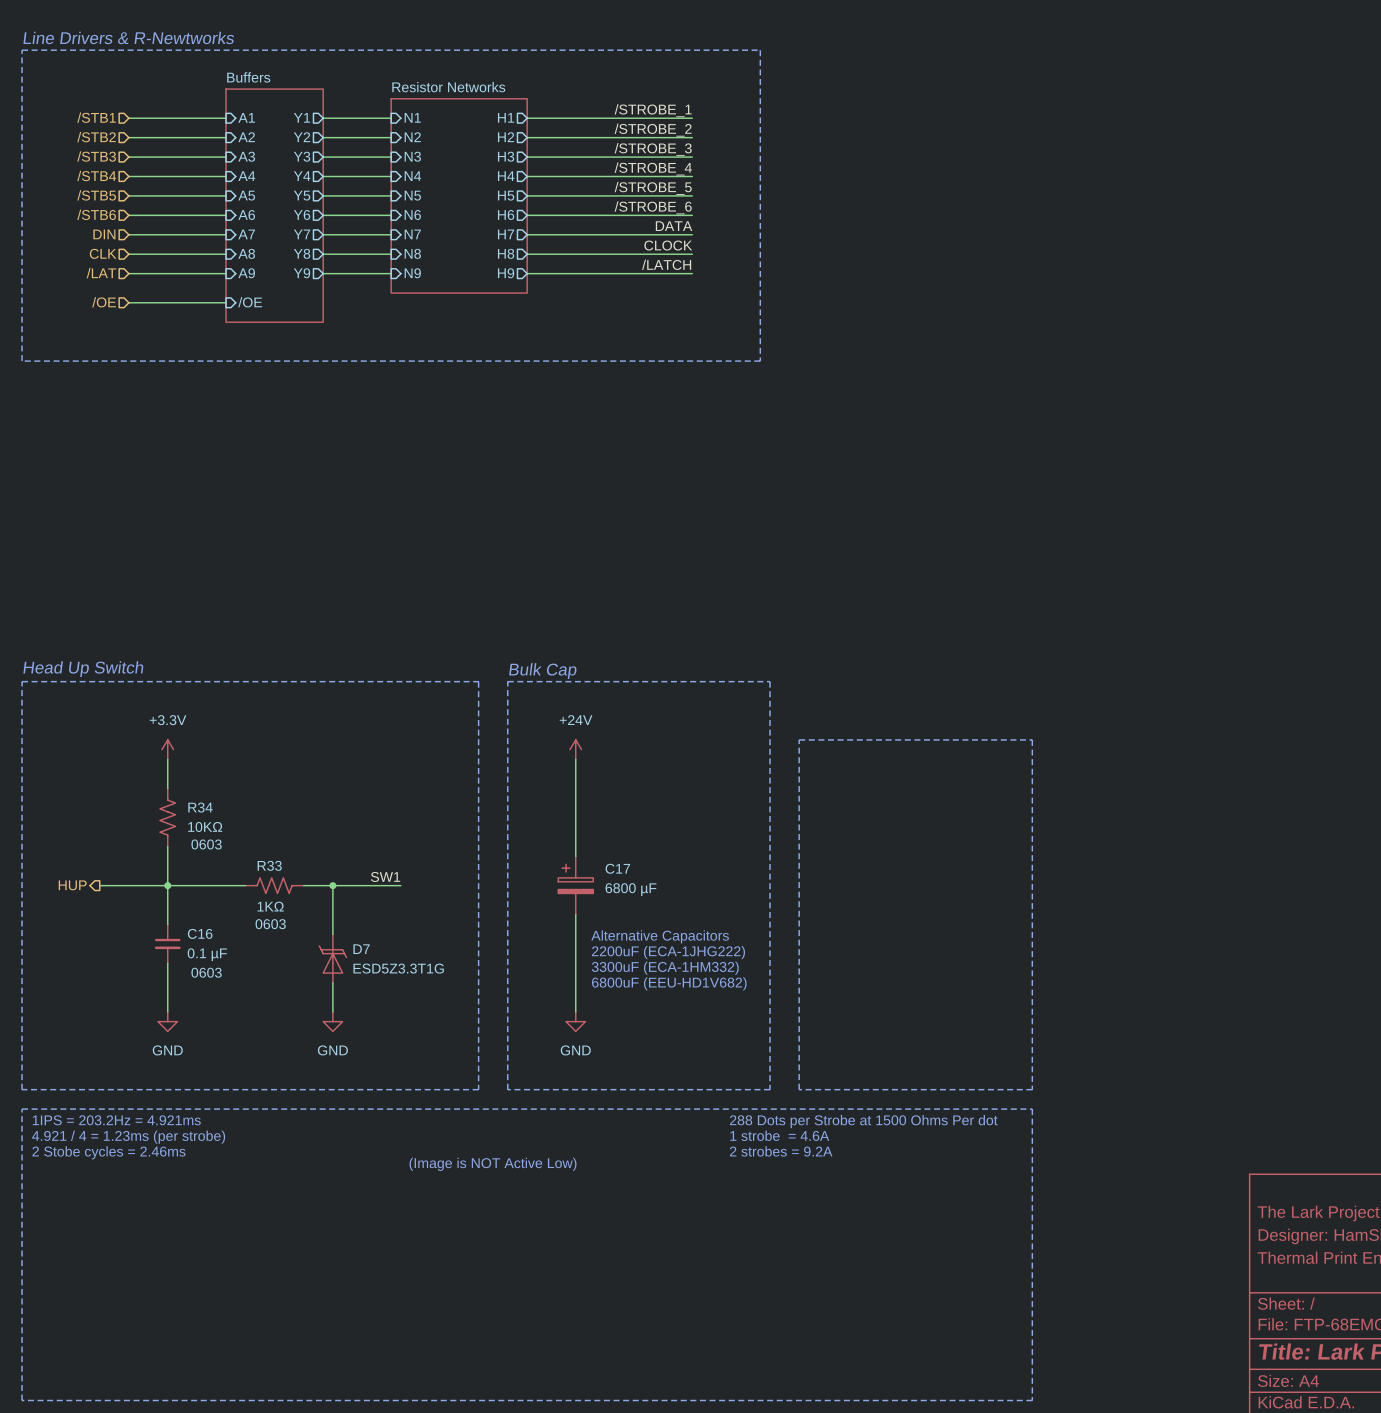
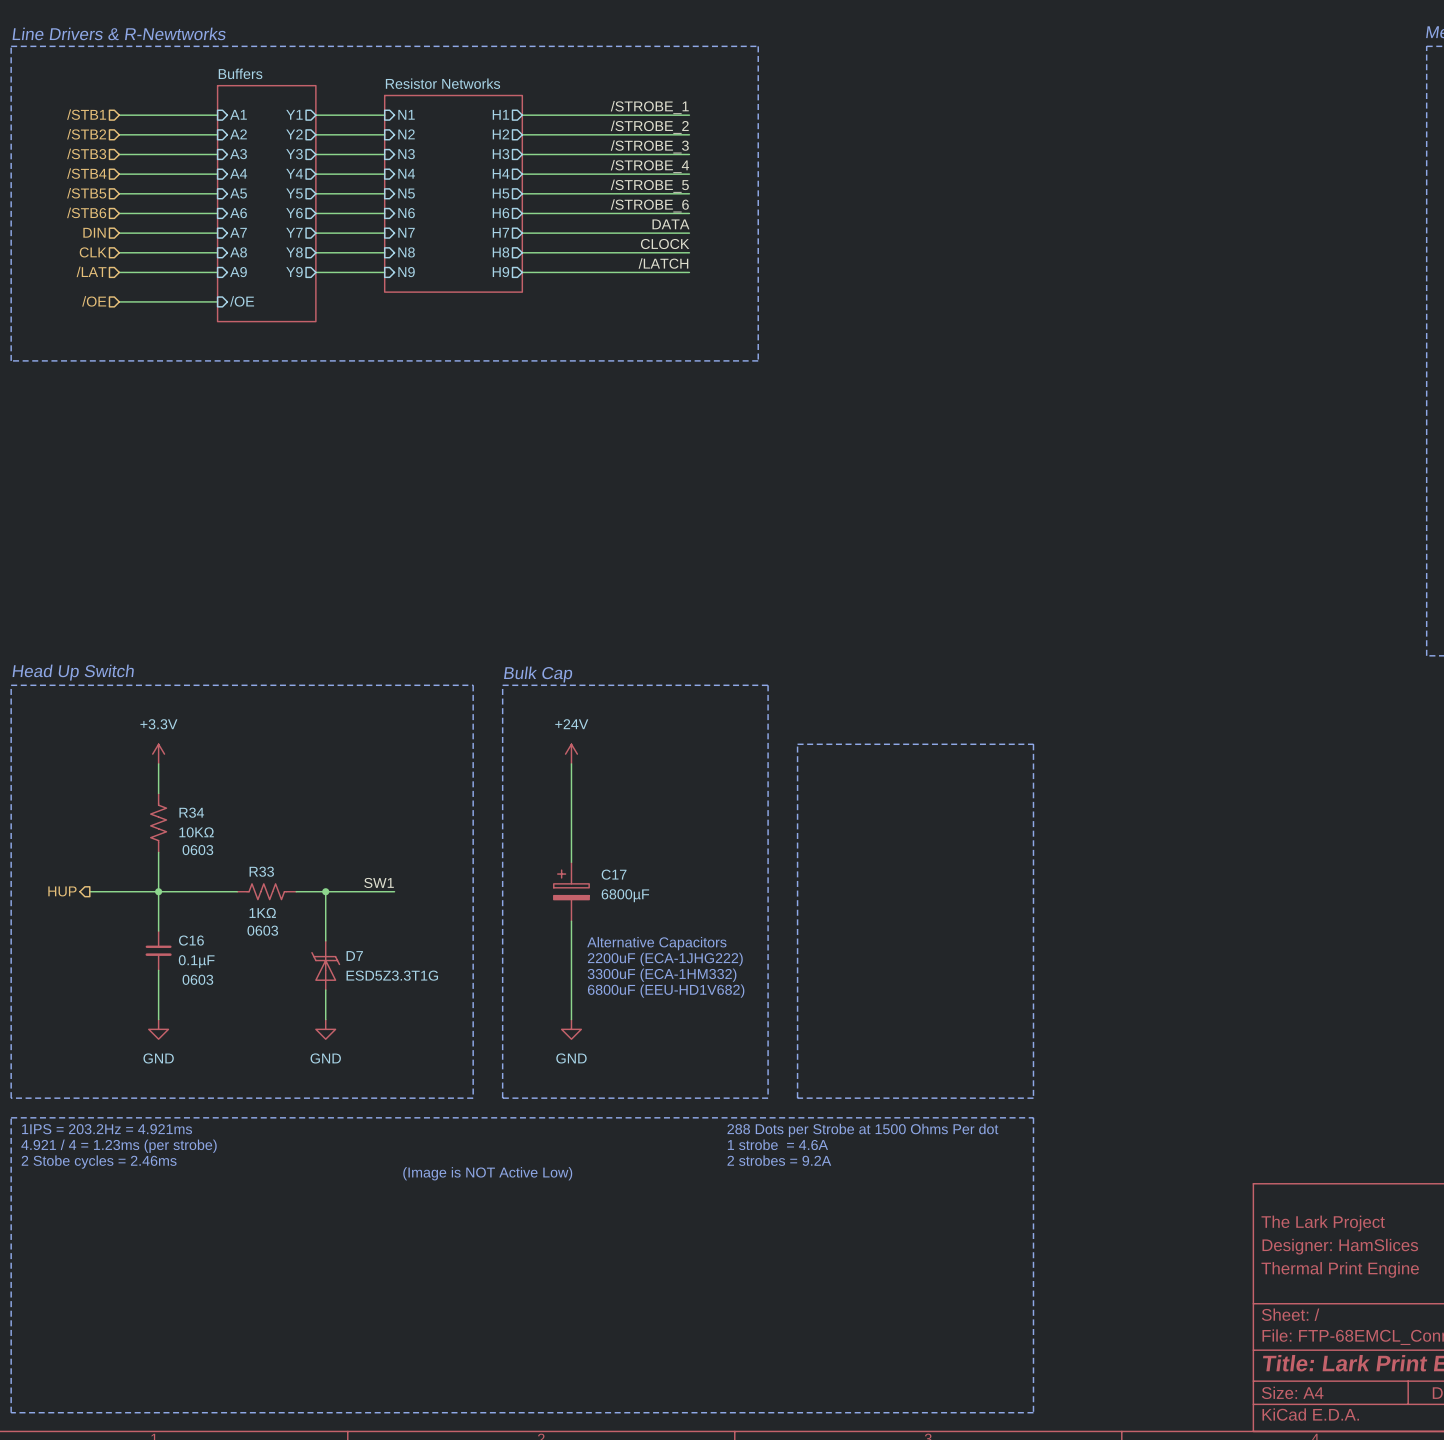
C17 value: 6800 µF (631, 889) -> 6800µF (625, 895)
C16 value: 0.1 µF (207, 954) -> 0.1µF (196, 961)

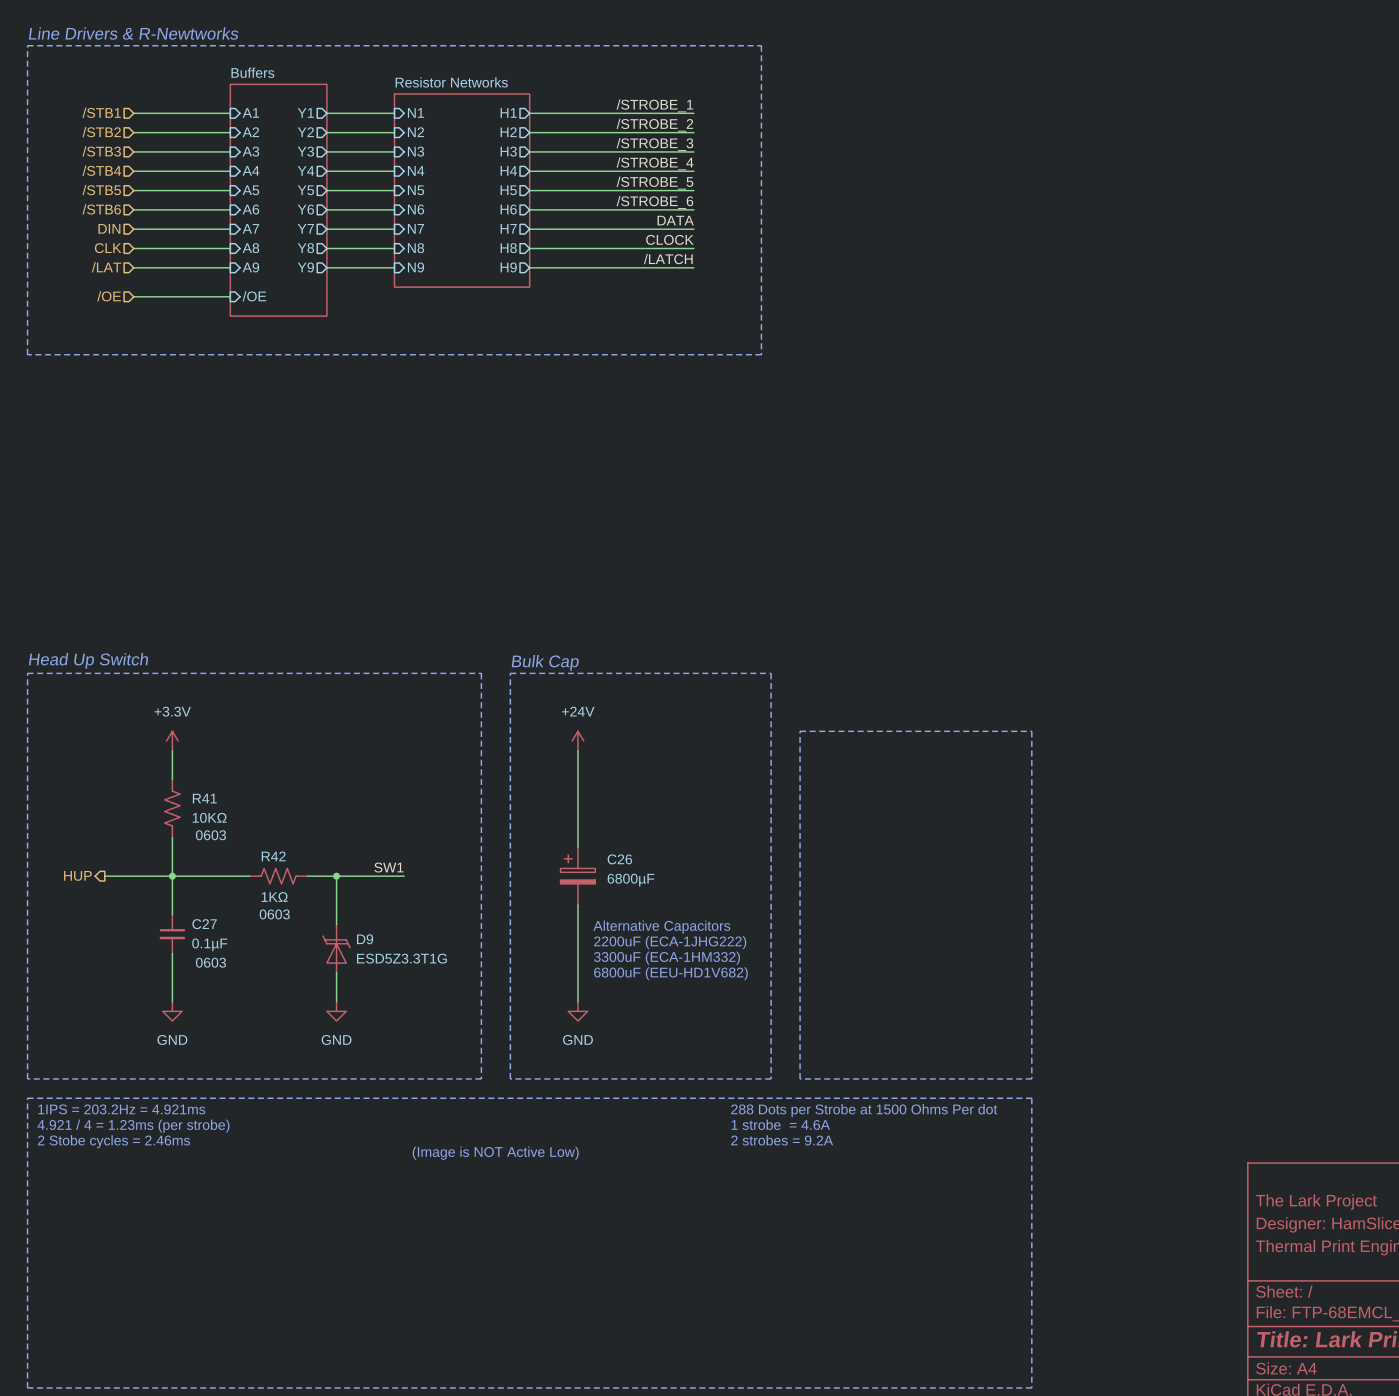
R34 name: R34 (191, 812) -> R41 (204, 798)
R33 name: R33 (261, 871) -> R42 (273, 856)
C17 name: C17 (614, 874) -> C26 (619, 859)
C16 name: C16 (191, 940) -> C27 (204, 924)
D7 name: D7 (354, 956) -> D9 (365, 939)

